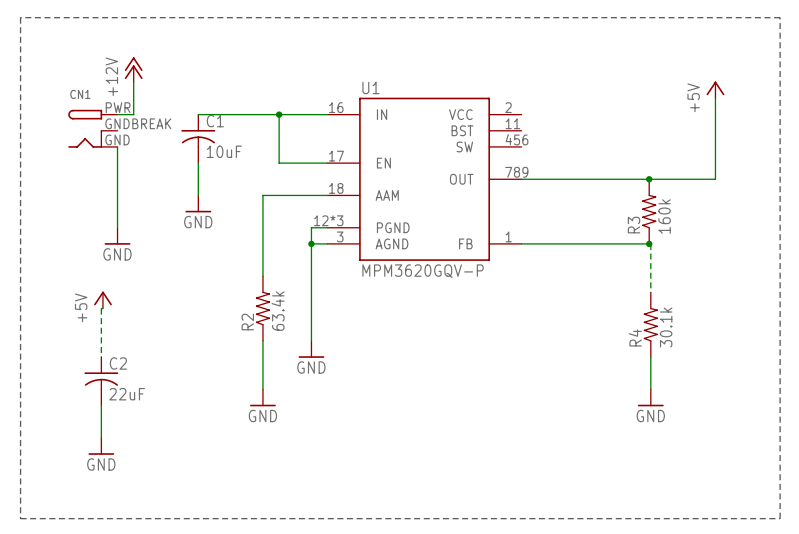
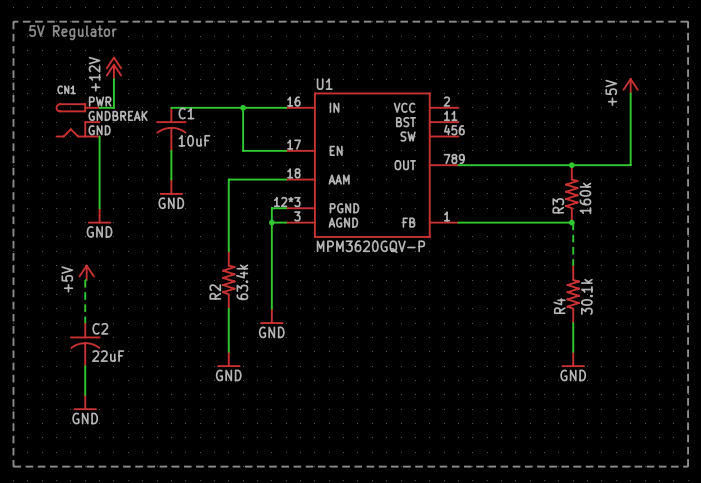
text: none -> 5V Regulator (72, 32)

